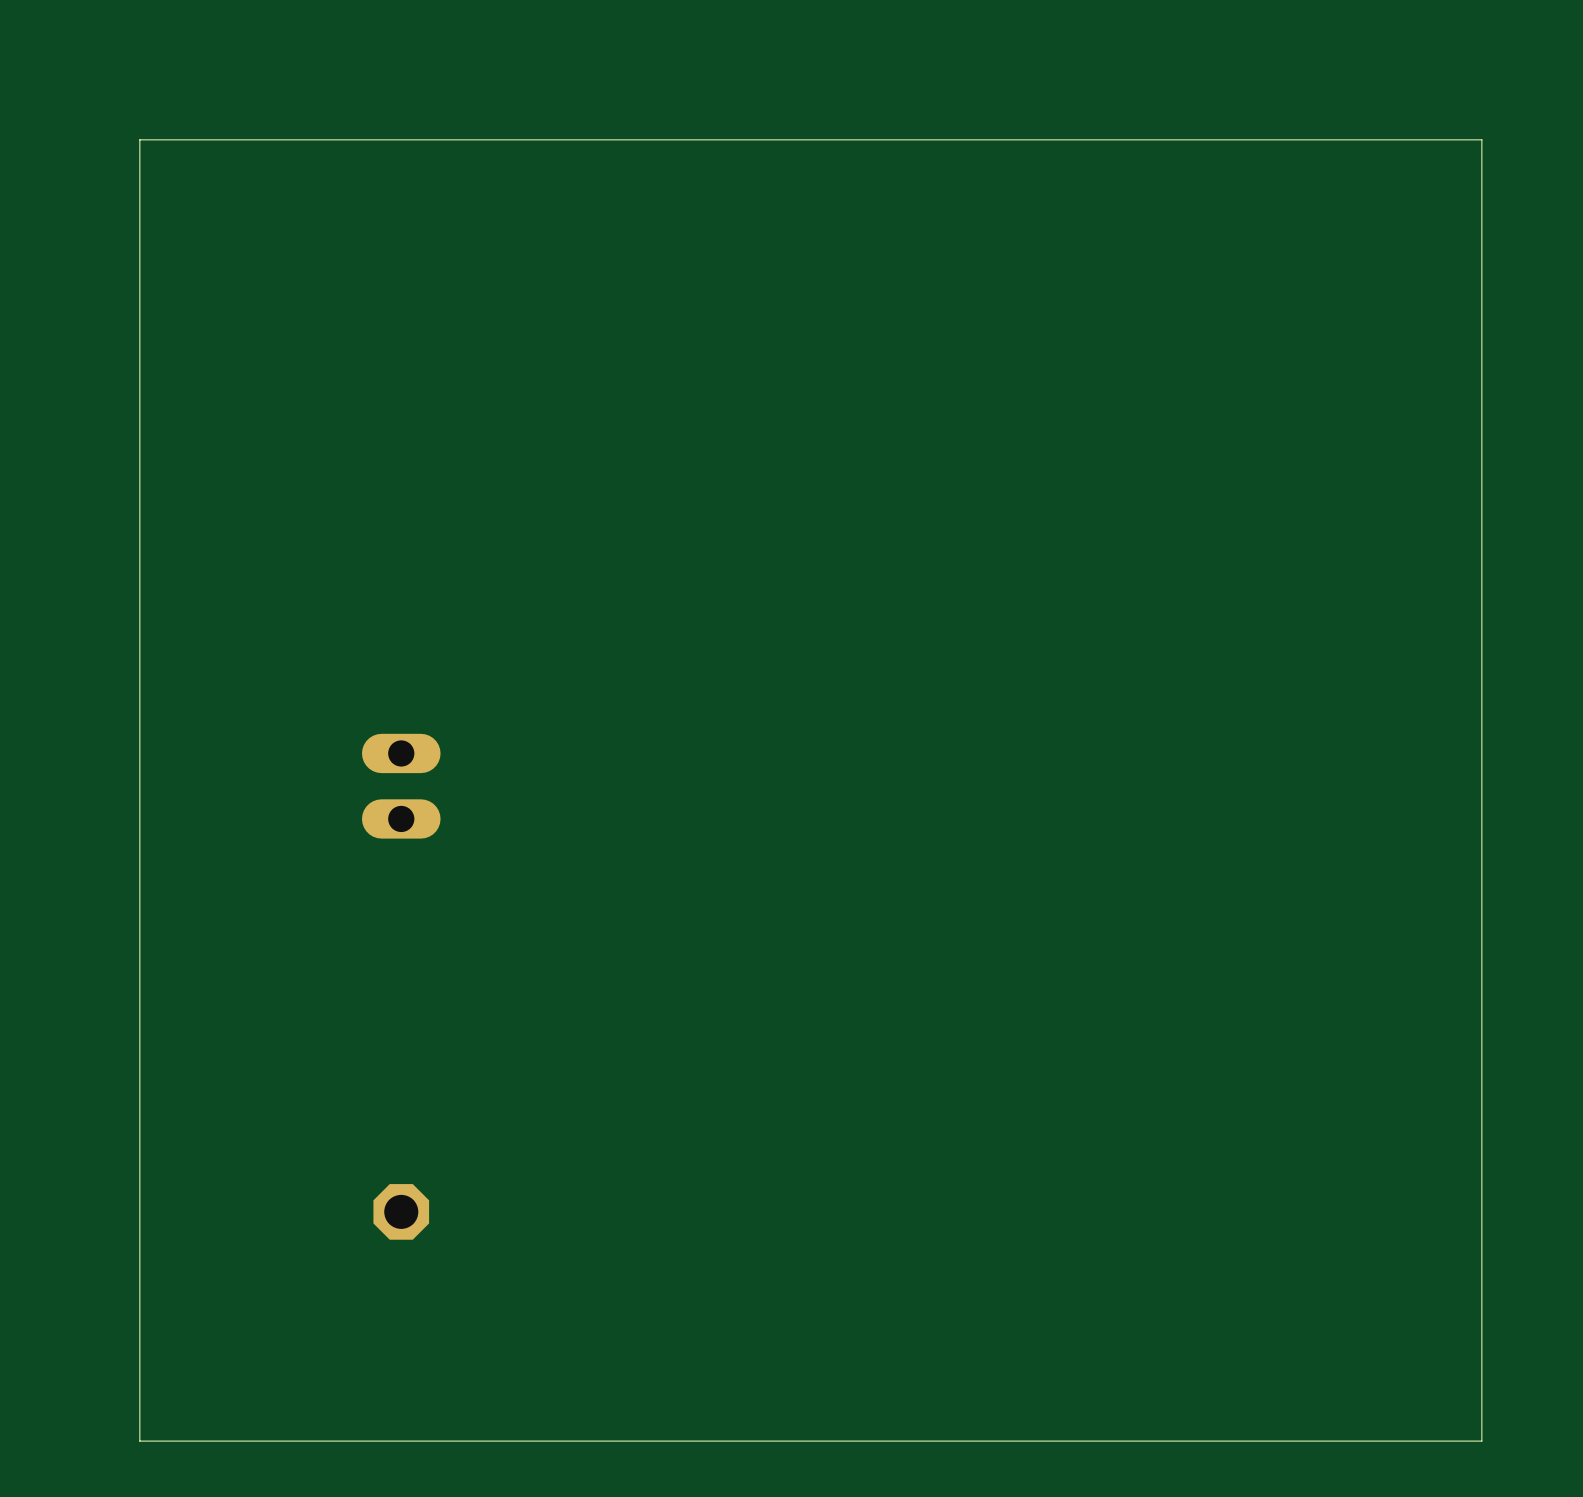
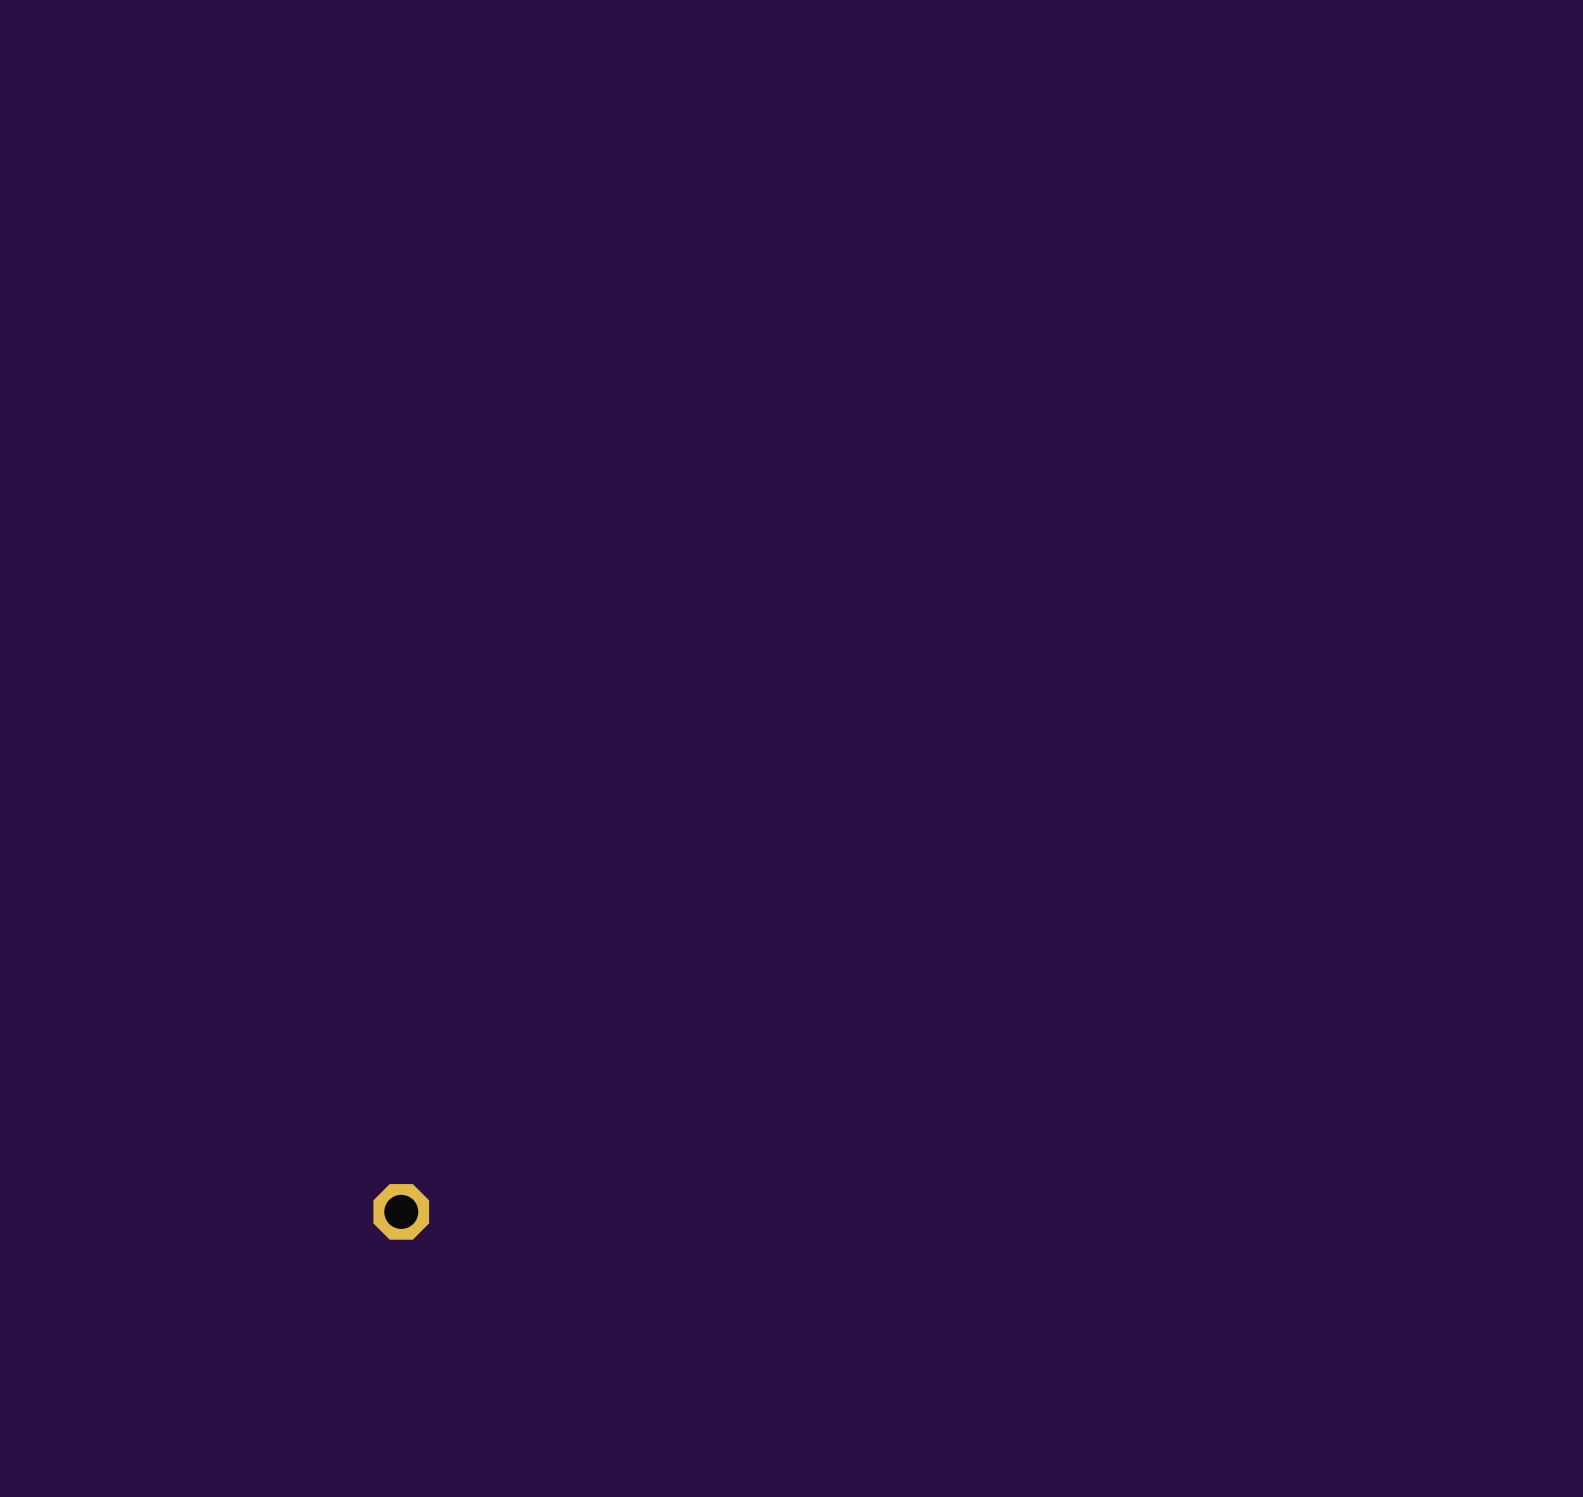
board edge: (1481, 139) (139, 139) (139, 1441) (1481, 1441) (1481, 139) -> none
part: (401, 786) -> none

